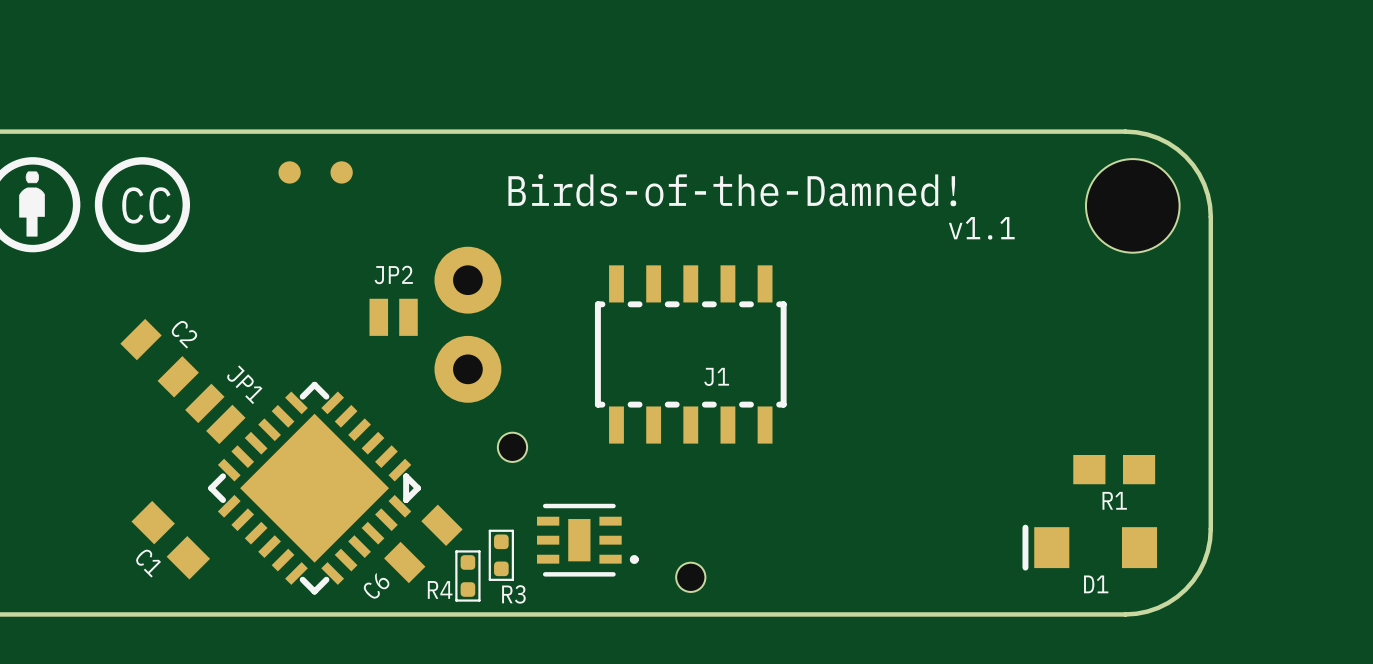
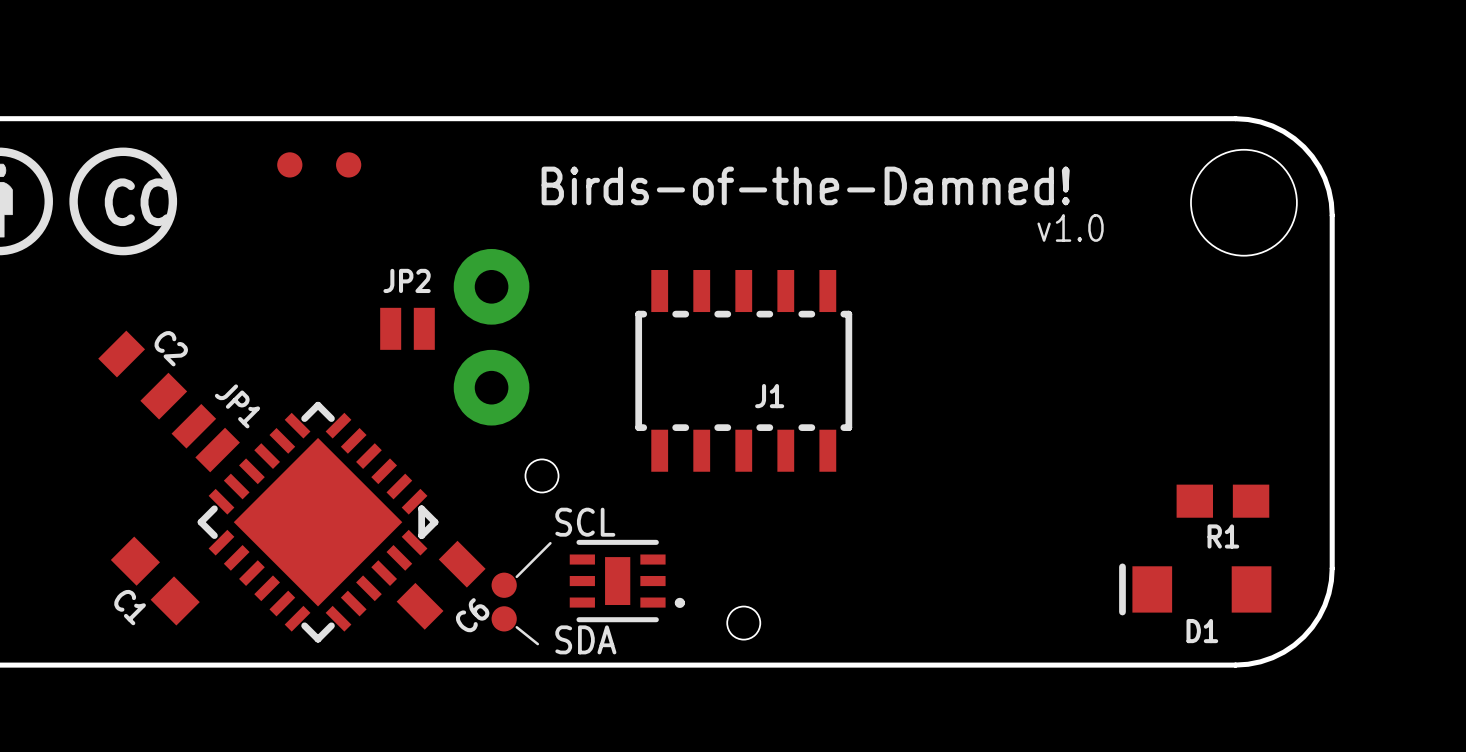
text: v1.1 (981, 228) -> v1.0 (1070, 227)
text: none -> SCL (585, 522)
line: none -> (550, 543) (516, 576)
part: none -> (504, 585)
R4: (501, 555) -> none
part: none -> (504, 618)
R3: (467, 576) -> none
line: none -> (516, 627) (537, 644)
C6 name position: C6 (376, 586) -> C6 (472, 615)
text: none -> SDA (585, 639)

